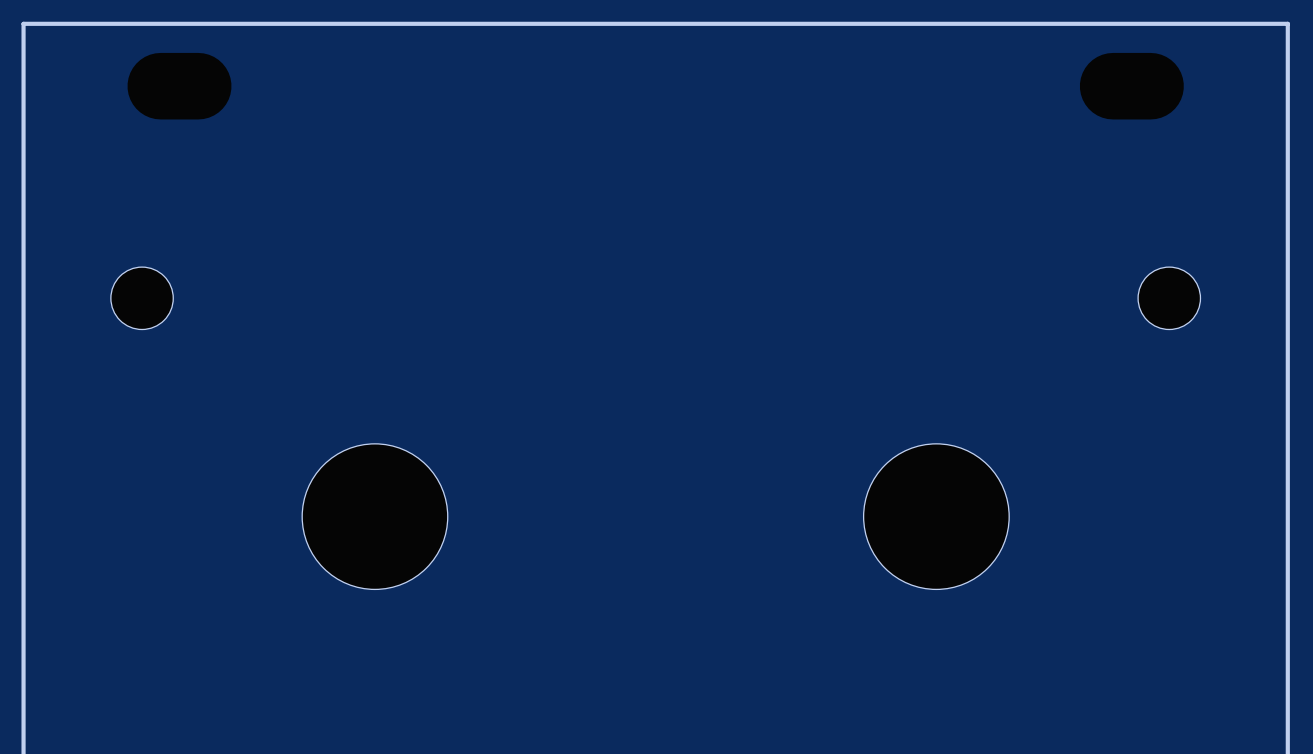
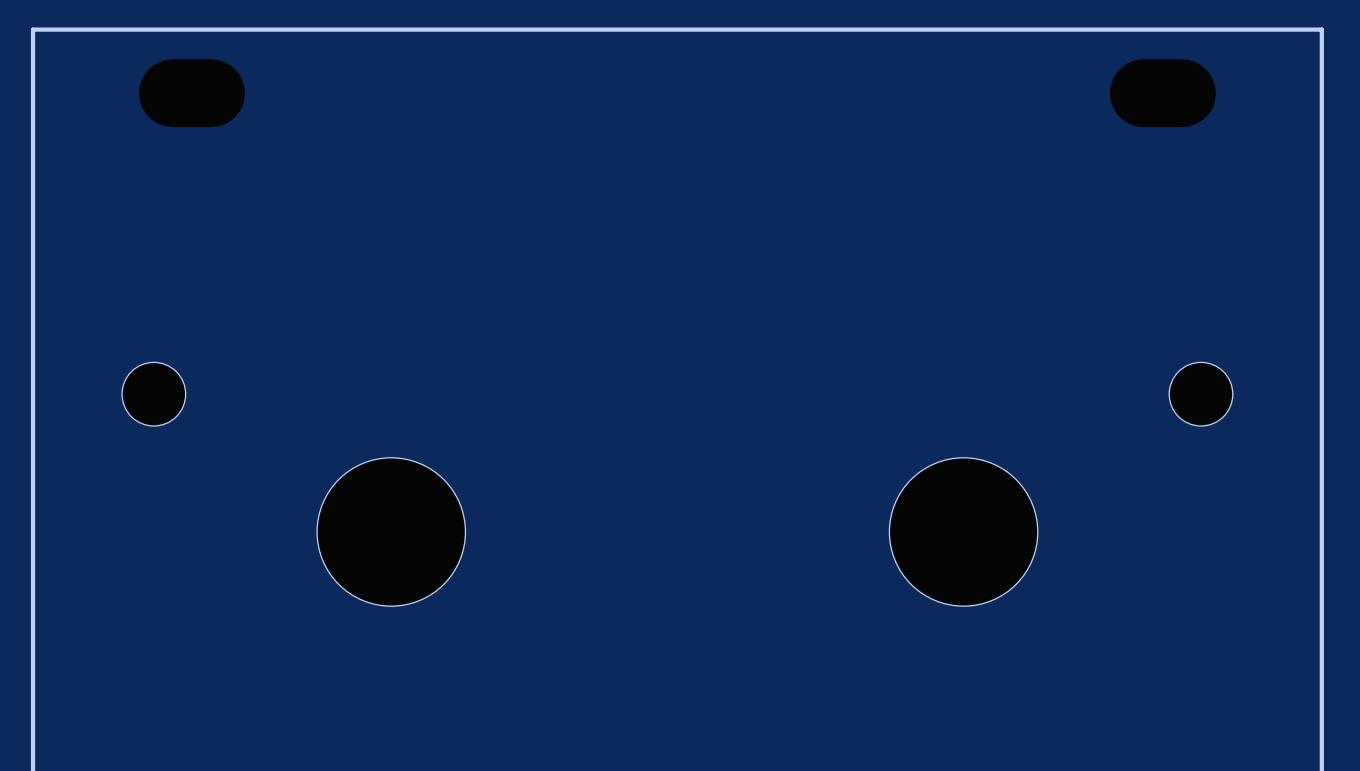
part position: (142, 298) -> (153, 394)
part position: (1169, 298) -> (1201, 394)

